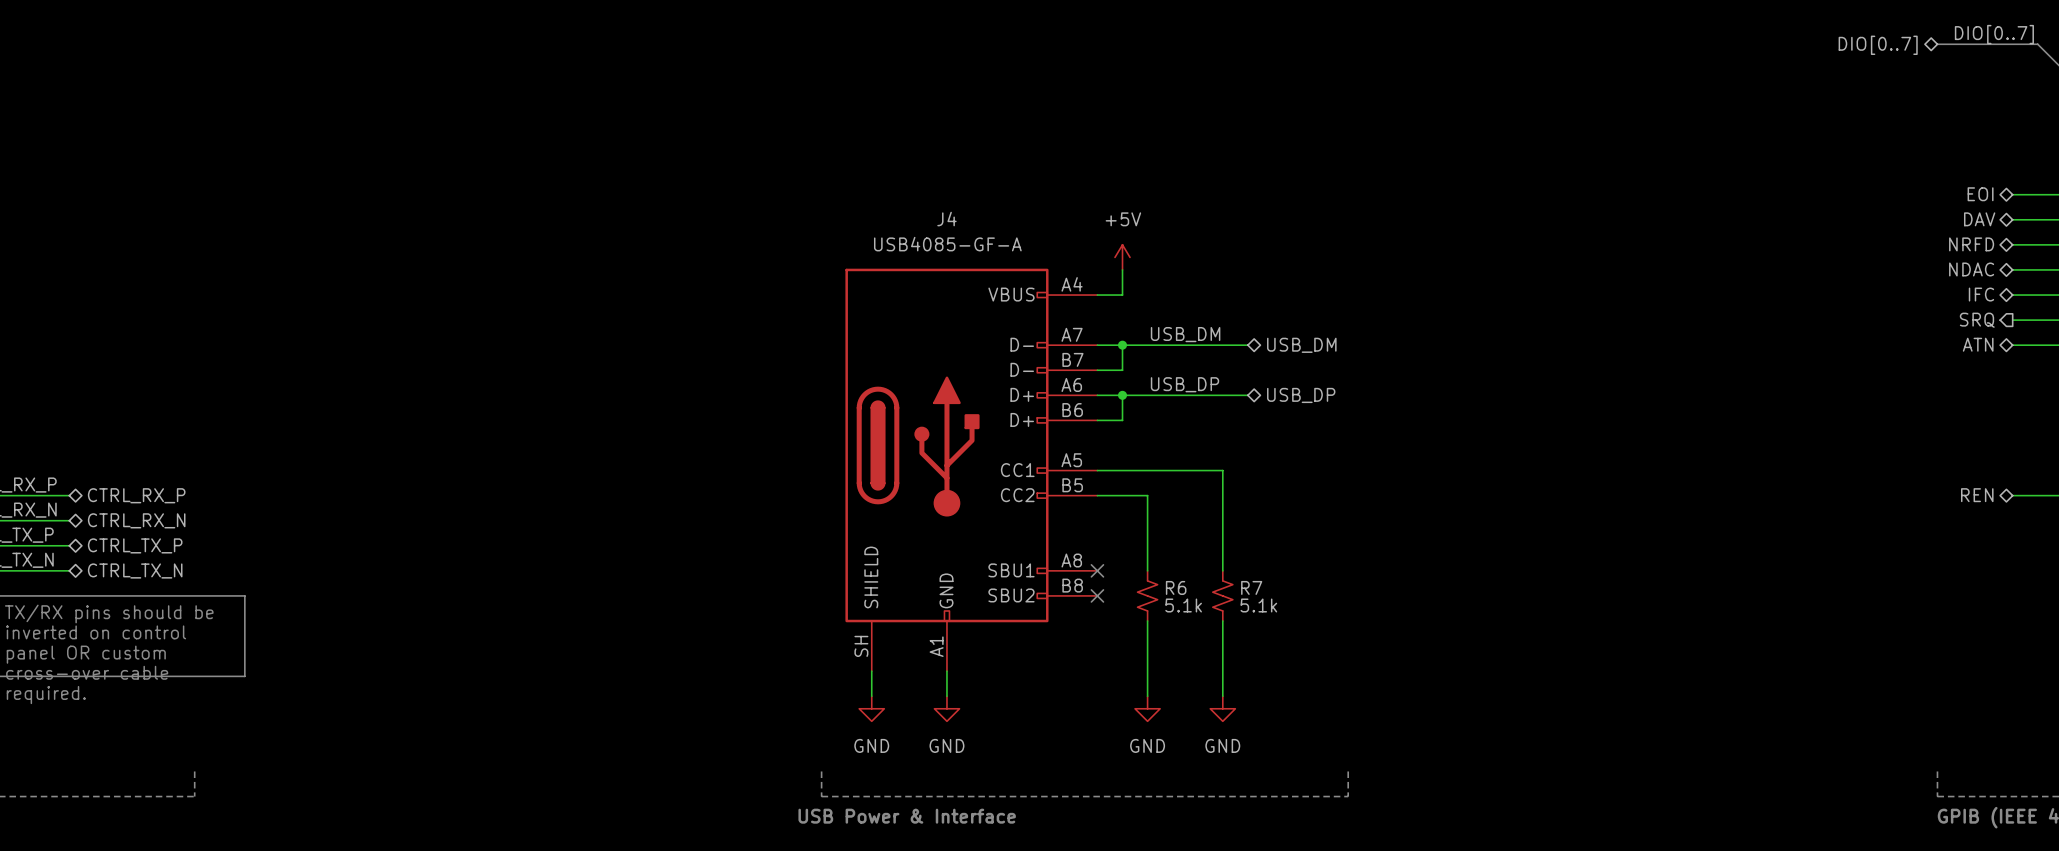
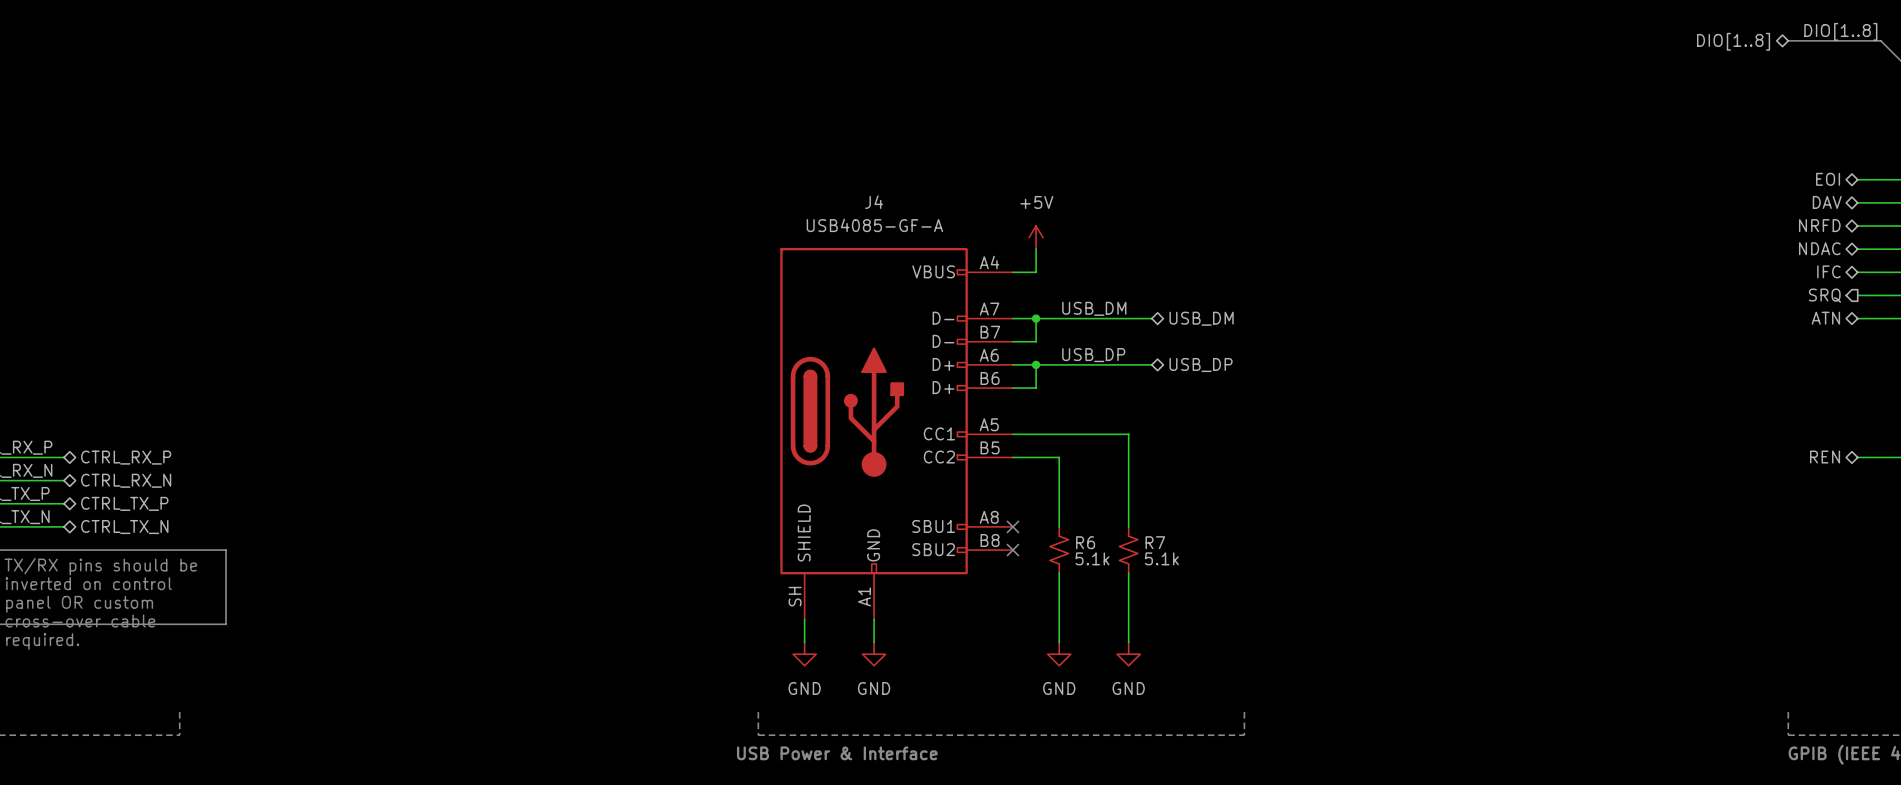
label: DIO[0..7] (1994, 34) -> DIO[1..8] (1840, 31)
hierarchical label: DIO[0..7] (1878, 45) -> DIO[1..8] (1733, 41)

